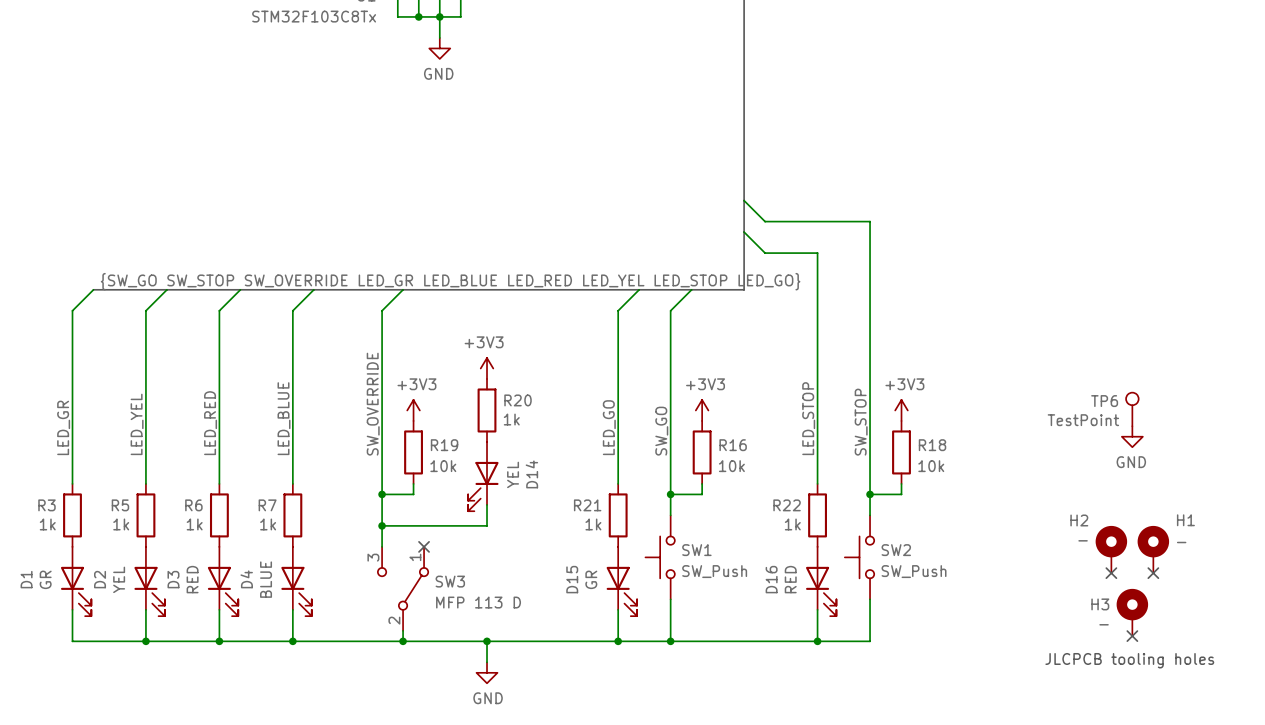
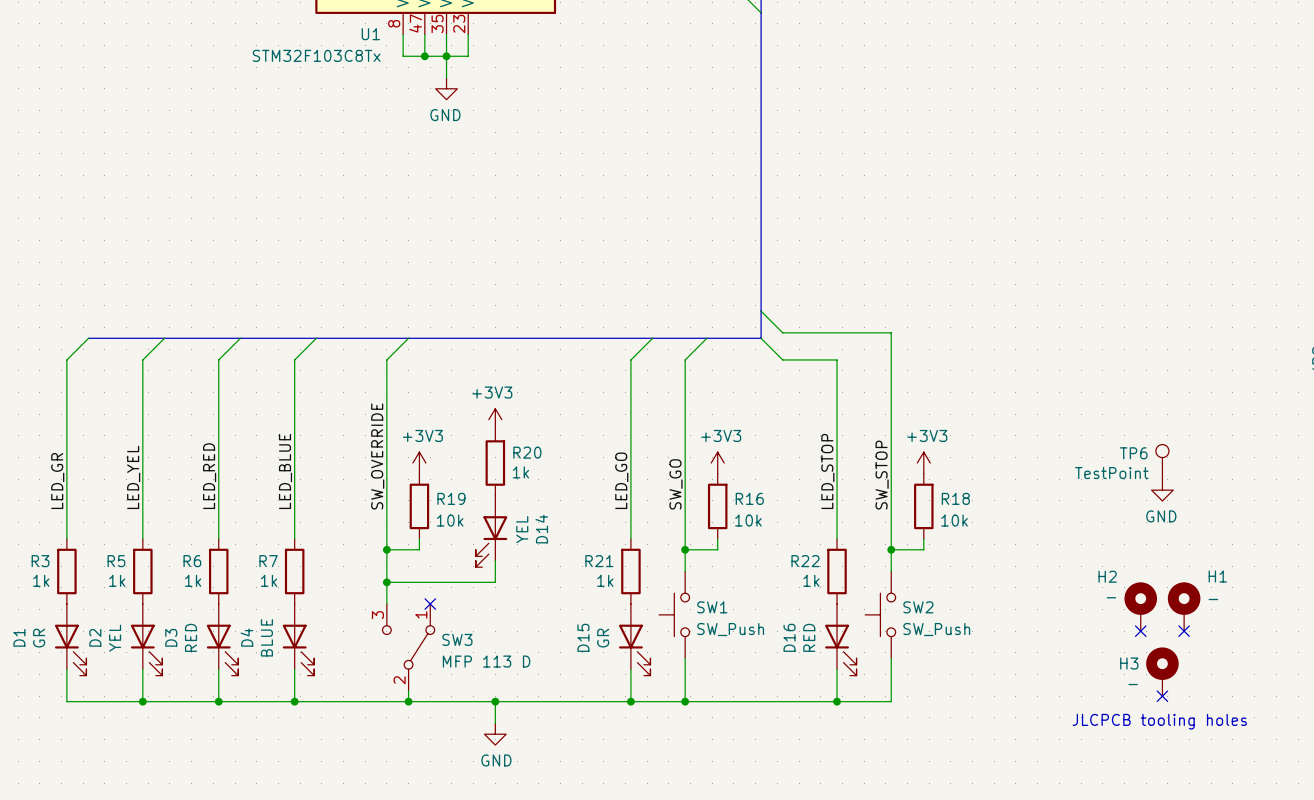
wire: (744, 200) (765, 221) (870, 221) (870, 284) -> (761, 311) (782, 332) (891, 332)
wire: (744, 232) (765, 253) (817, 253) (817, 310) -> (761, 338) (782, 359) (837, 359)
label: {SW_GO SW_STOP SW_OVERRIDE LED_GR LED_BLUE LED_RED LED_YEL LED_STOP LED_GO} (450, 281) -> none

